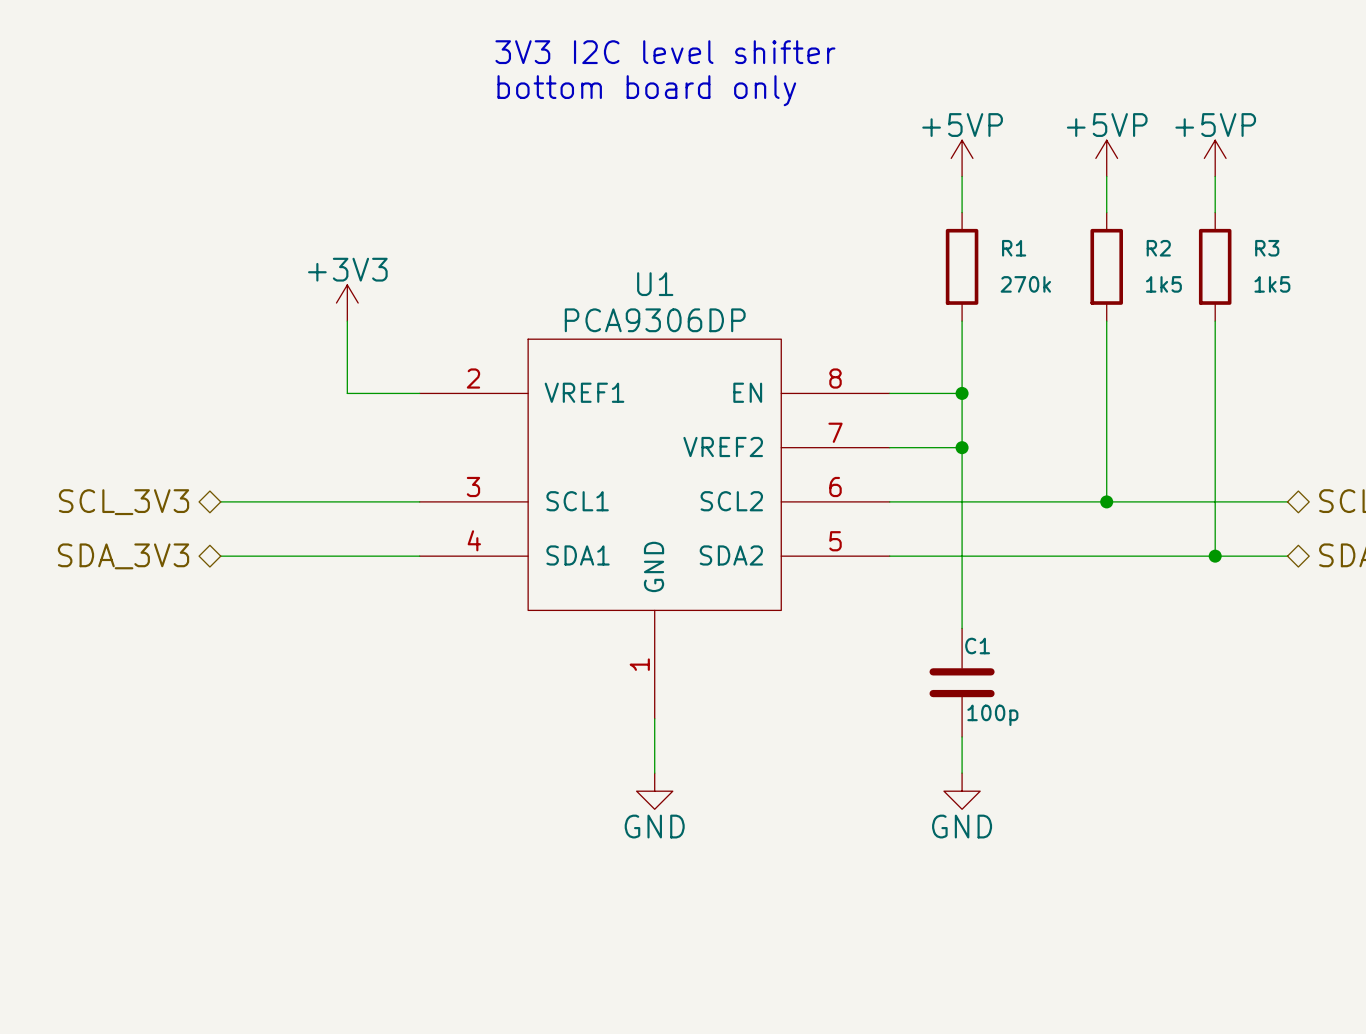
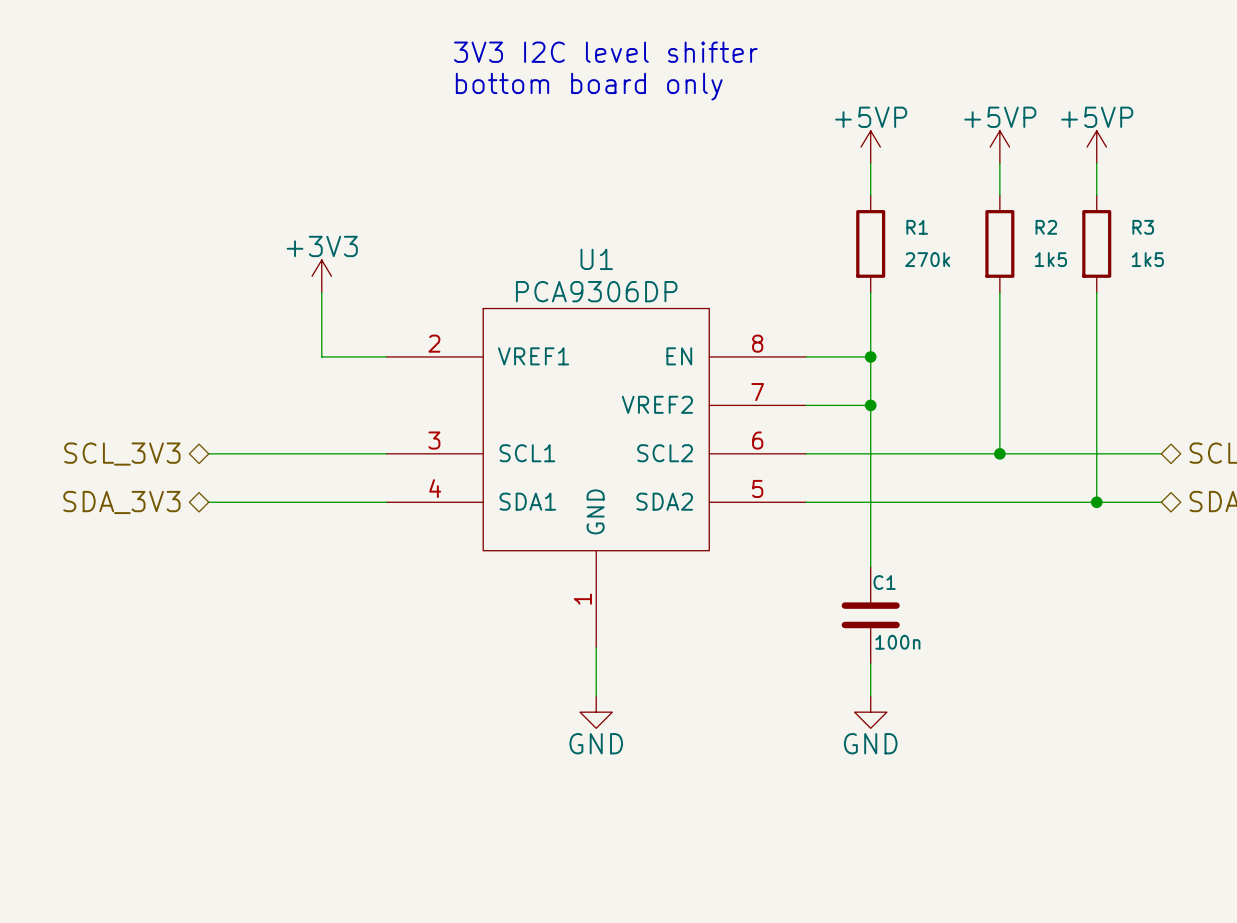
C1 value: 100p (992, 715) -> 100n (897, 642)

